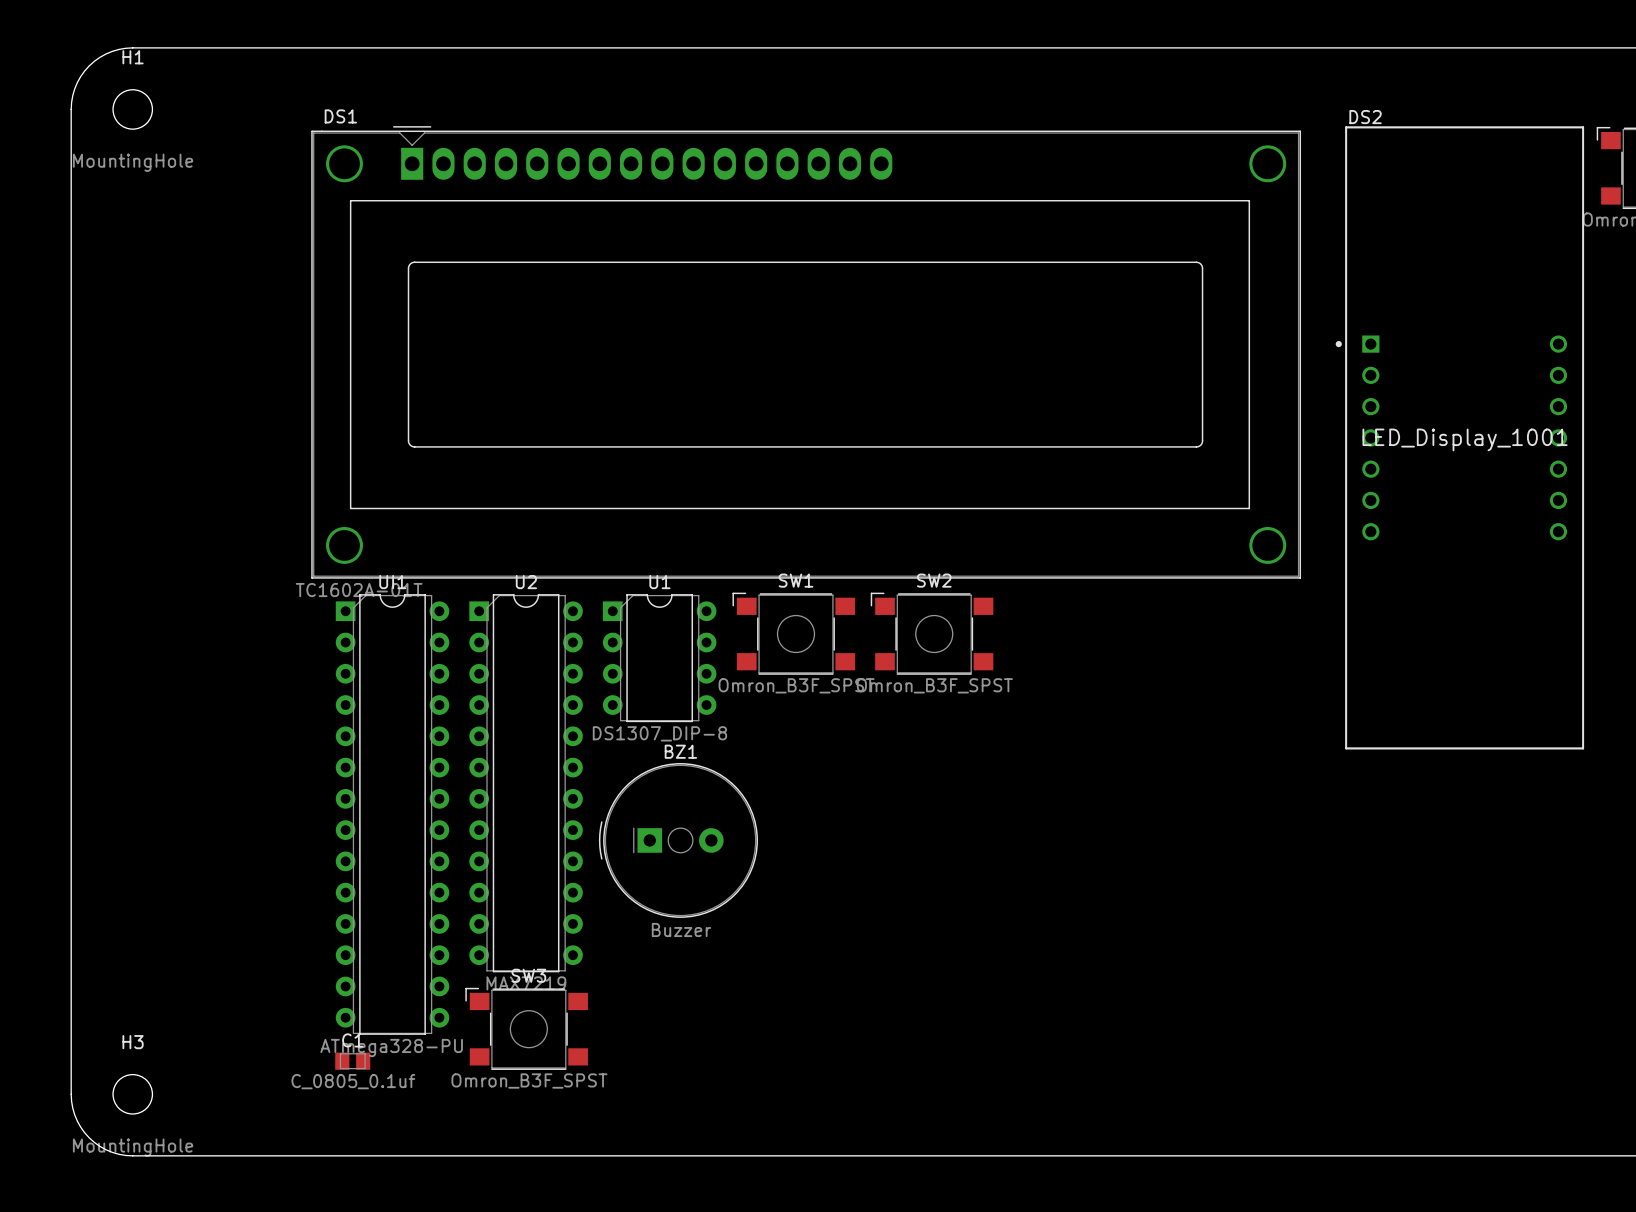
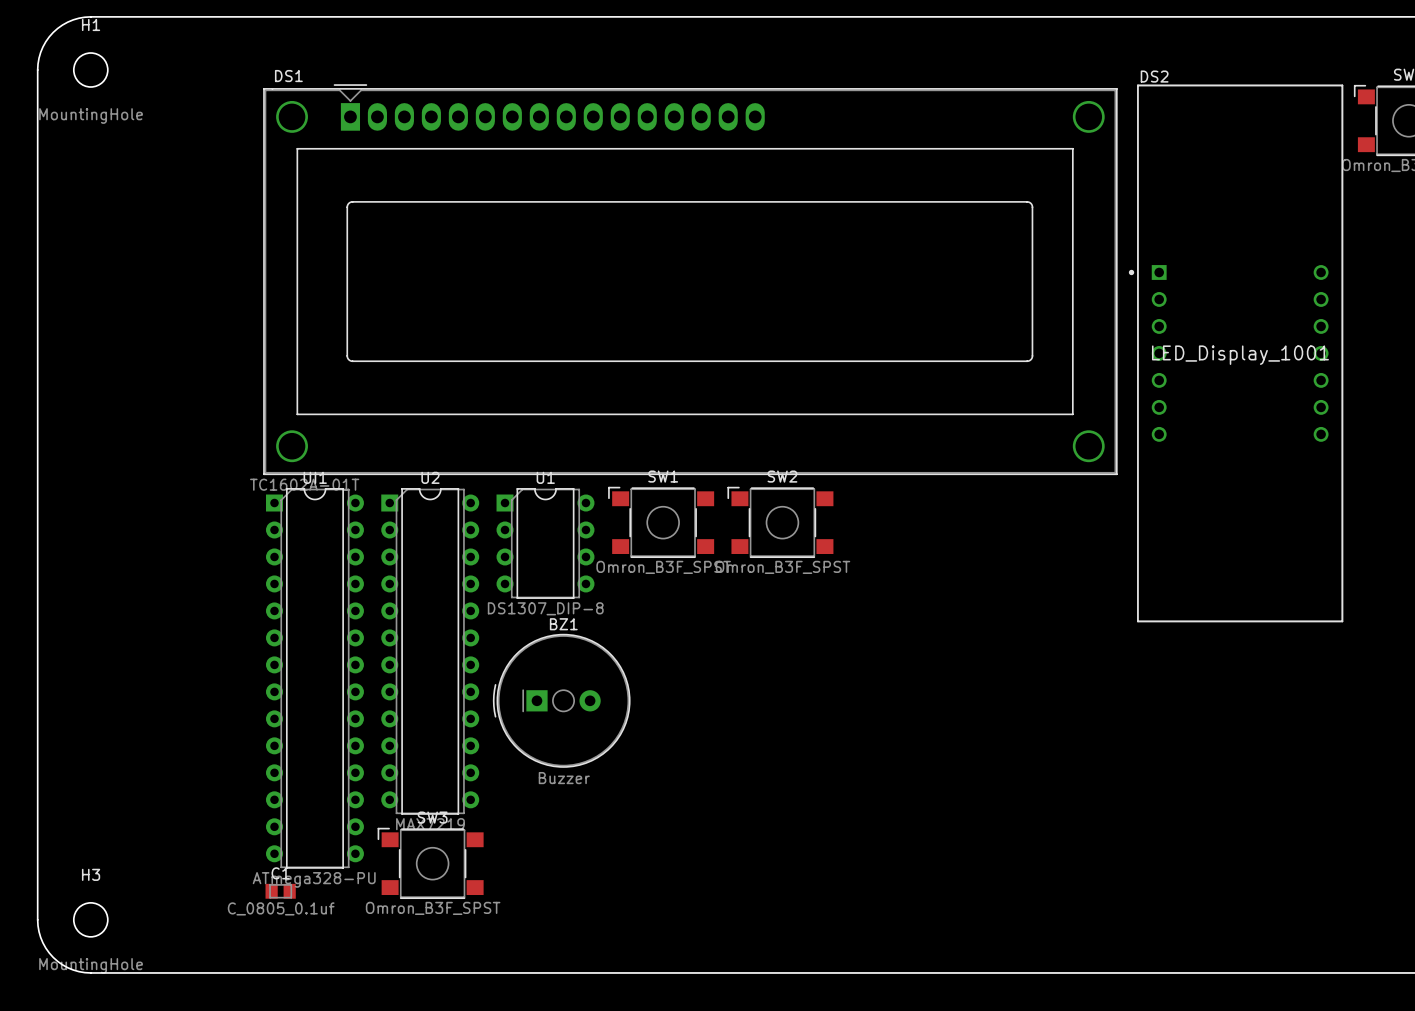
DS1 footprint: [311, 126, 1302, 579] -> [263, 84, 1118, 475]

